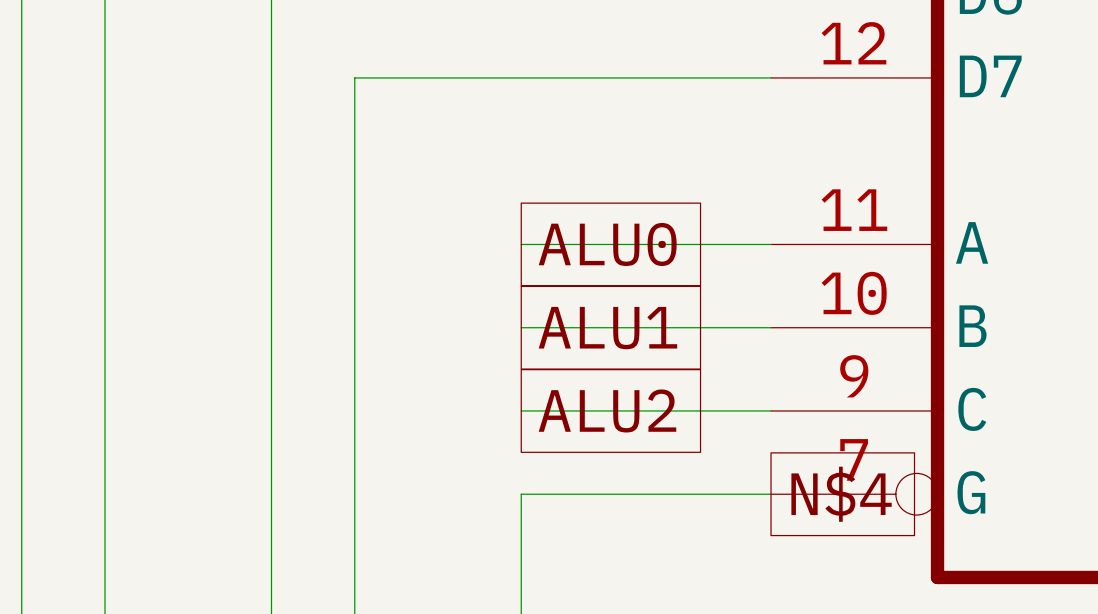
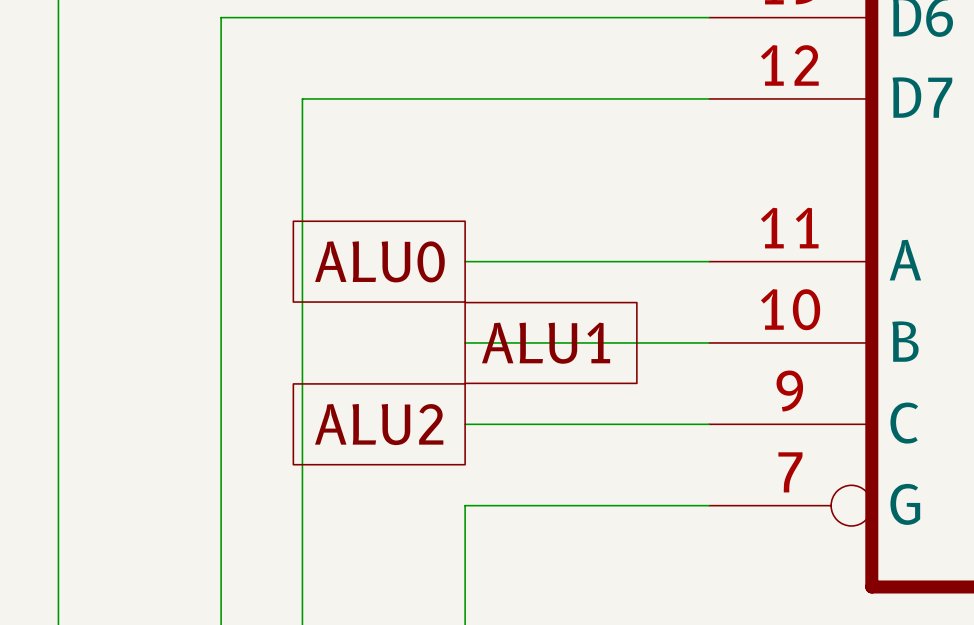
global label rotation: 0° (607, 244) -> 180° (379, 261)
global label rotation: 0° (607, 410) -> 180° (379, 424)
global label: N$4 (841, 494) -> none

